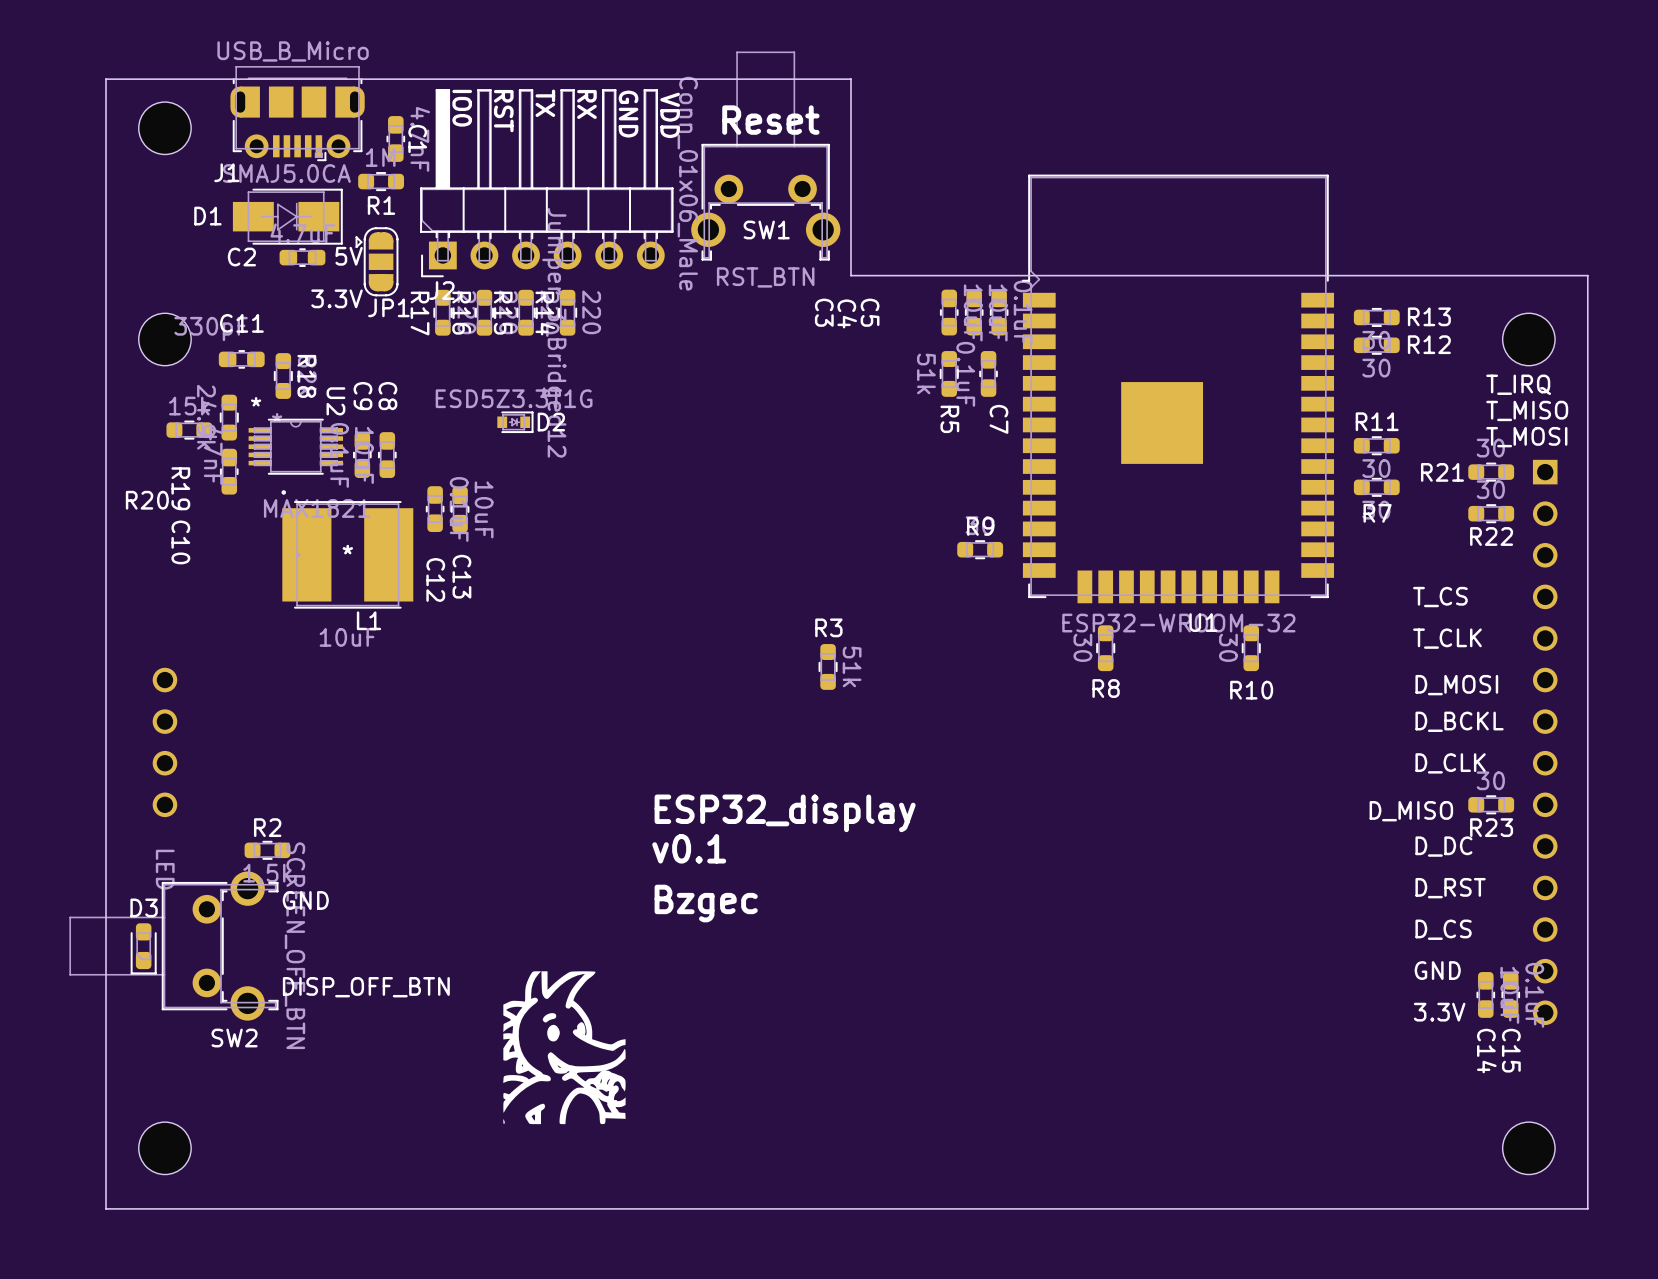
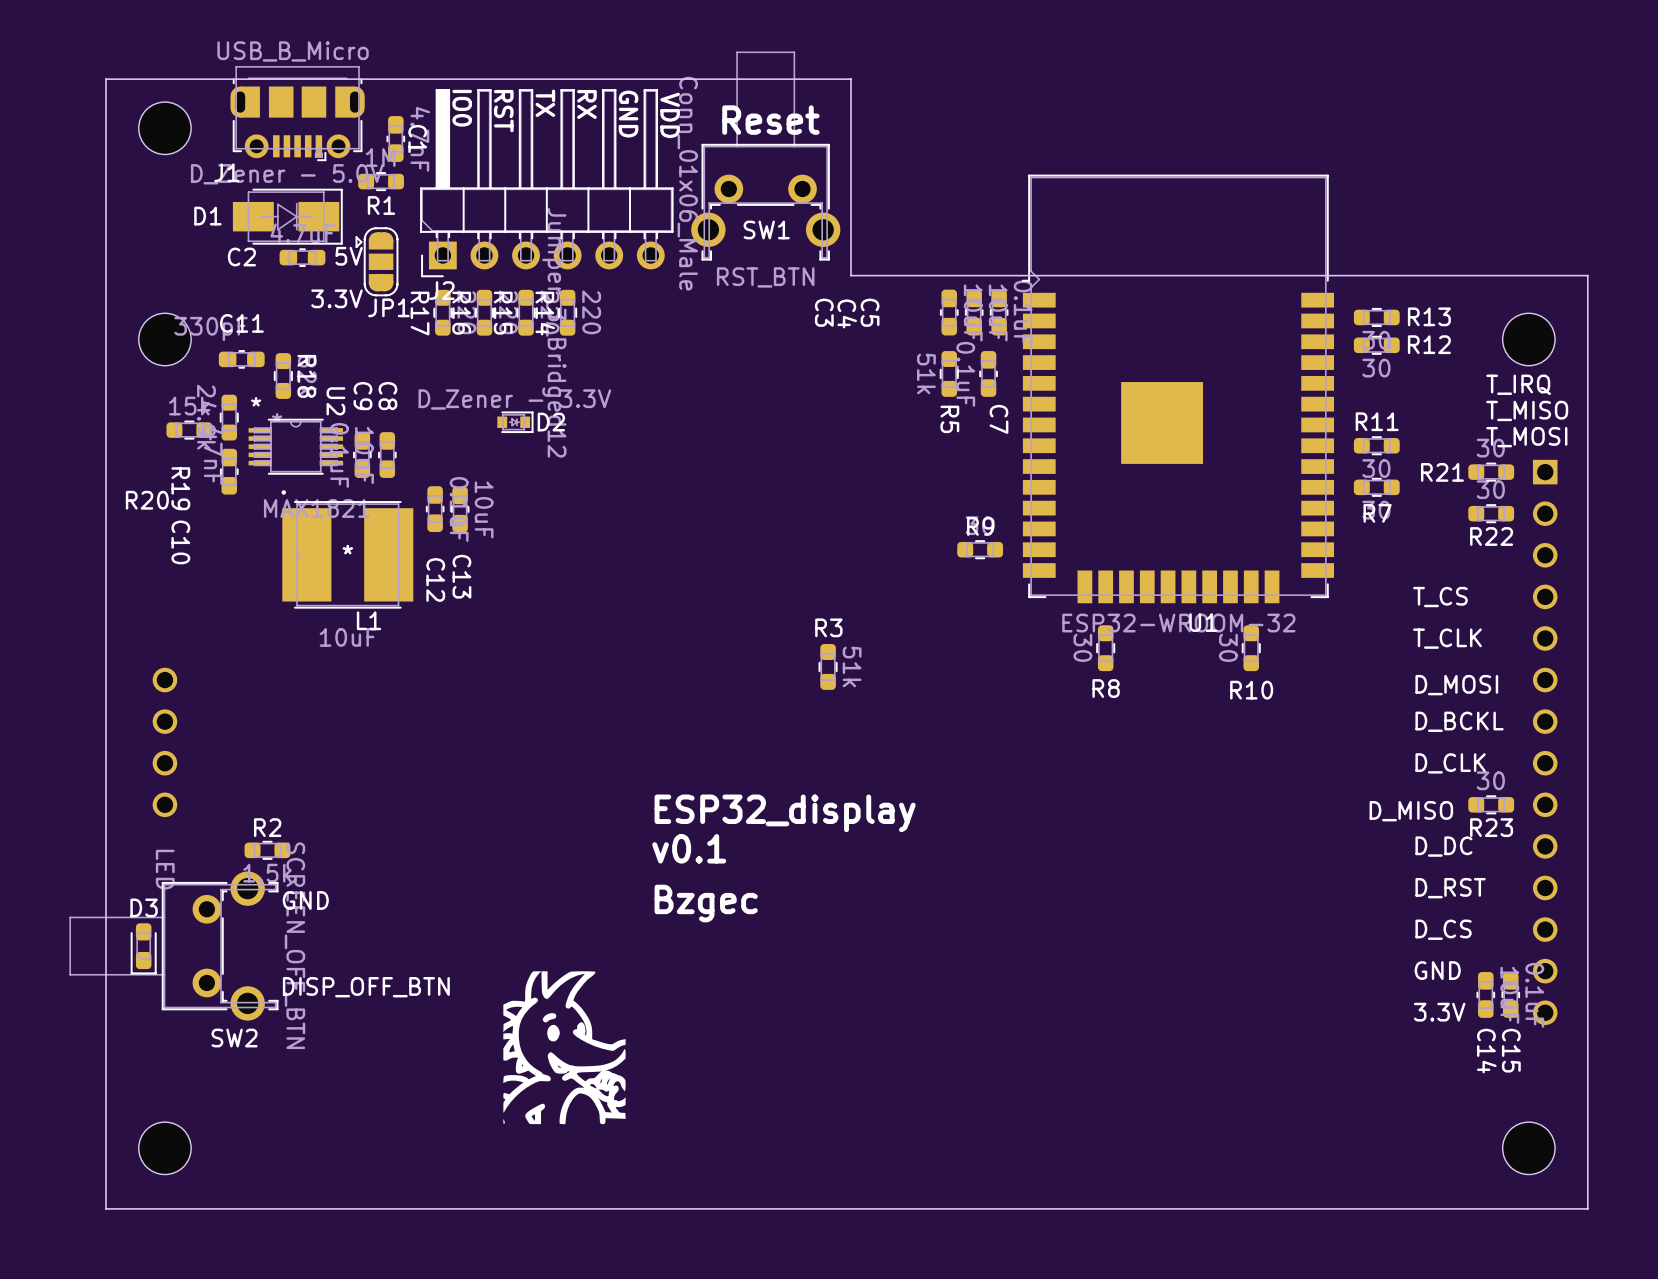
D1 value: SMAJ5.0CA (286, 173) -> D_Zener - 5.0V (287, 174)
D2 value: ESD5Z3.3T1G (514, 398) -> D_Zener - 3.3V (514, 399)

